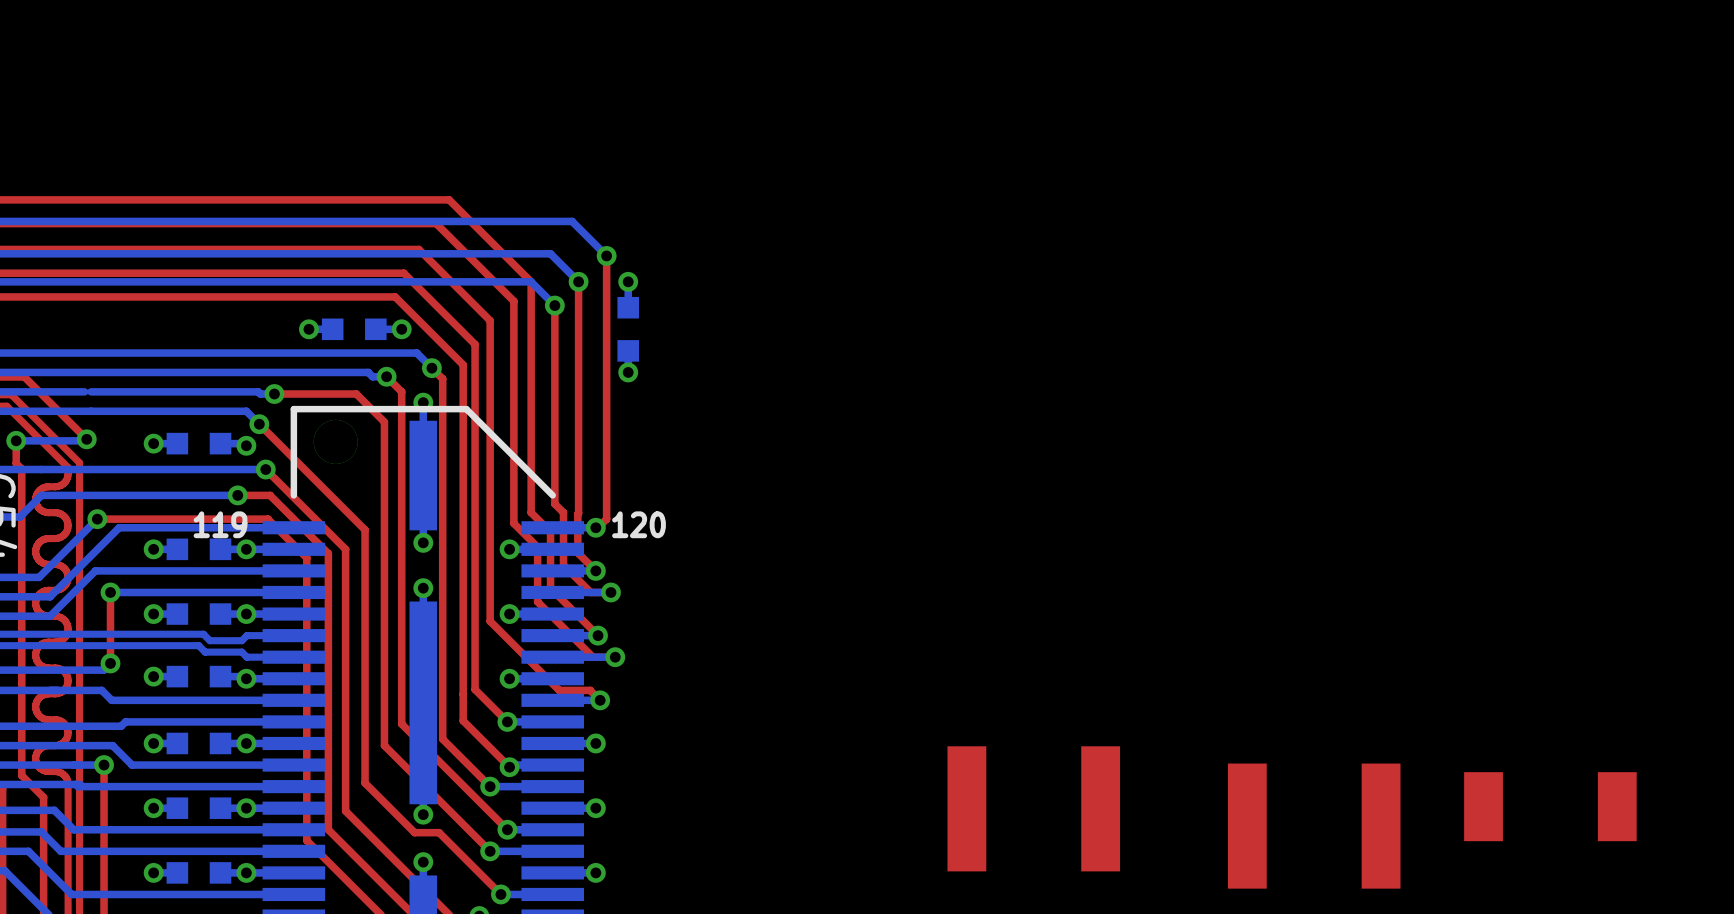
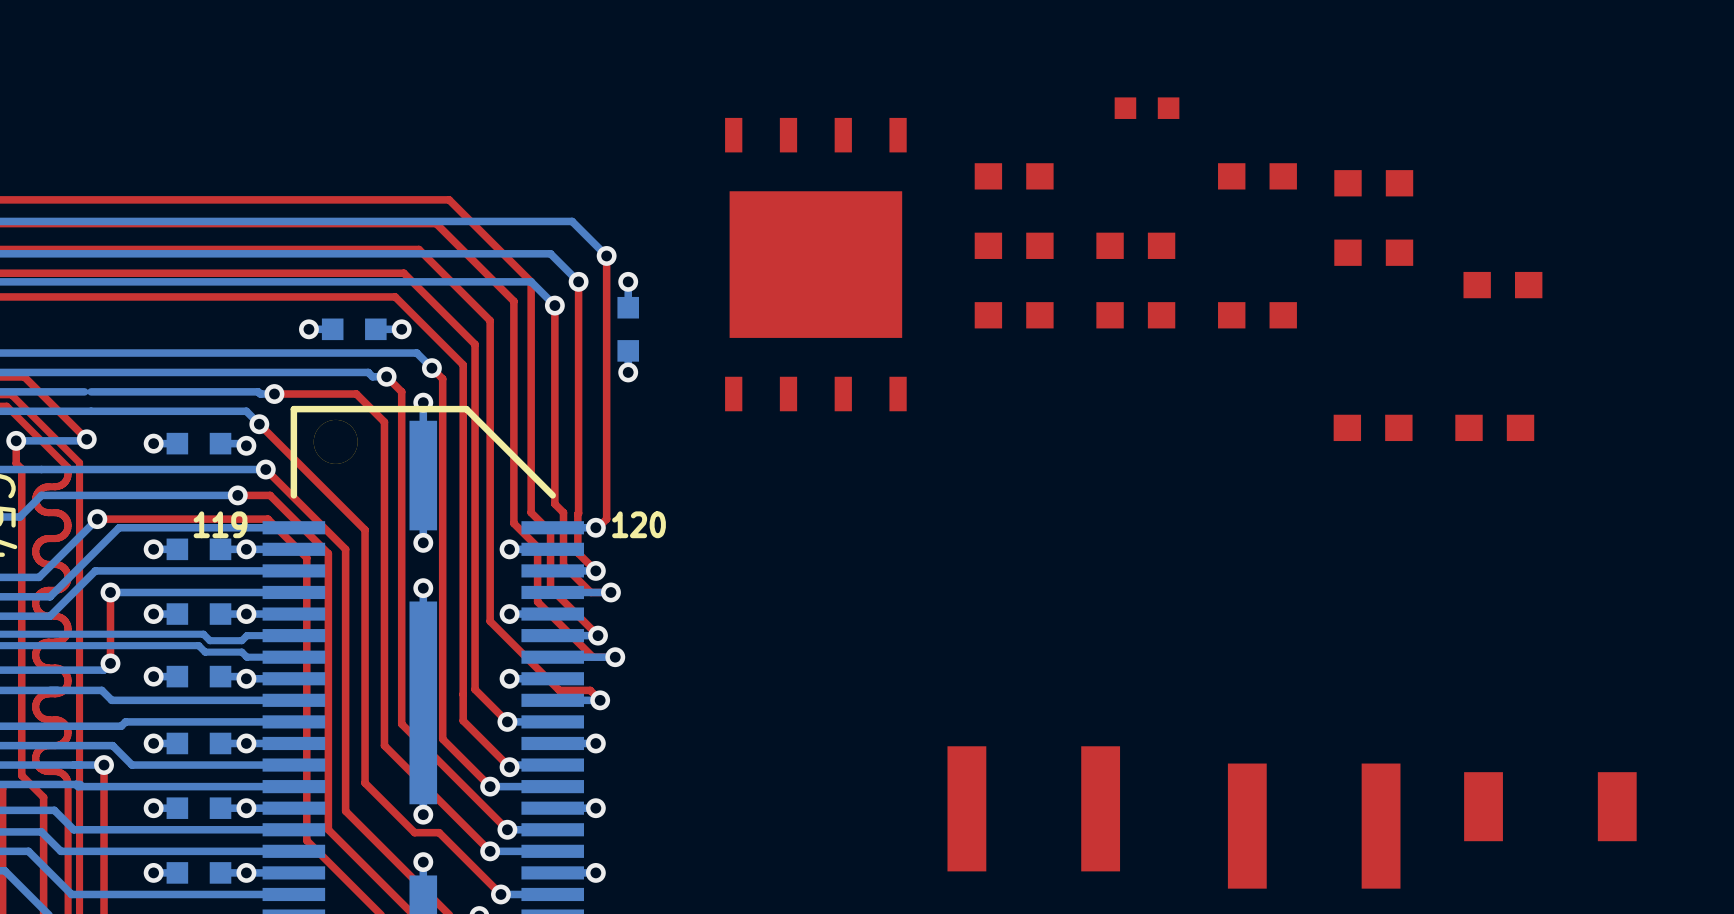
part: none -> (1147, 108)
part: none -> (1014, 176)
part: none -> (1257, 176)
part: none -> (1373, 183)
part: none -> (1014, 245)
part: none -> (1135, 245)
part: none -> (1373, 252)
part: none -> (815, 264)
part: none -> (1502, 285)
part: none -> (1014, 315)
part: none -> (1135, 315)
part: none -> (1257, 315)
part: none -> (1373, 427)
part: none -> (1494, 427)

